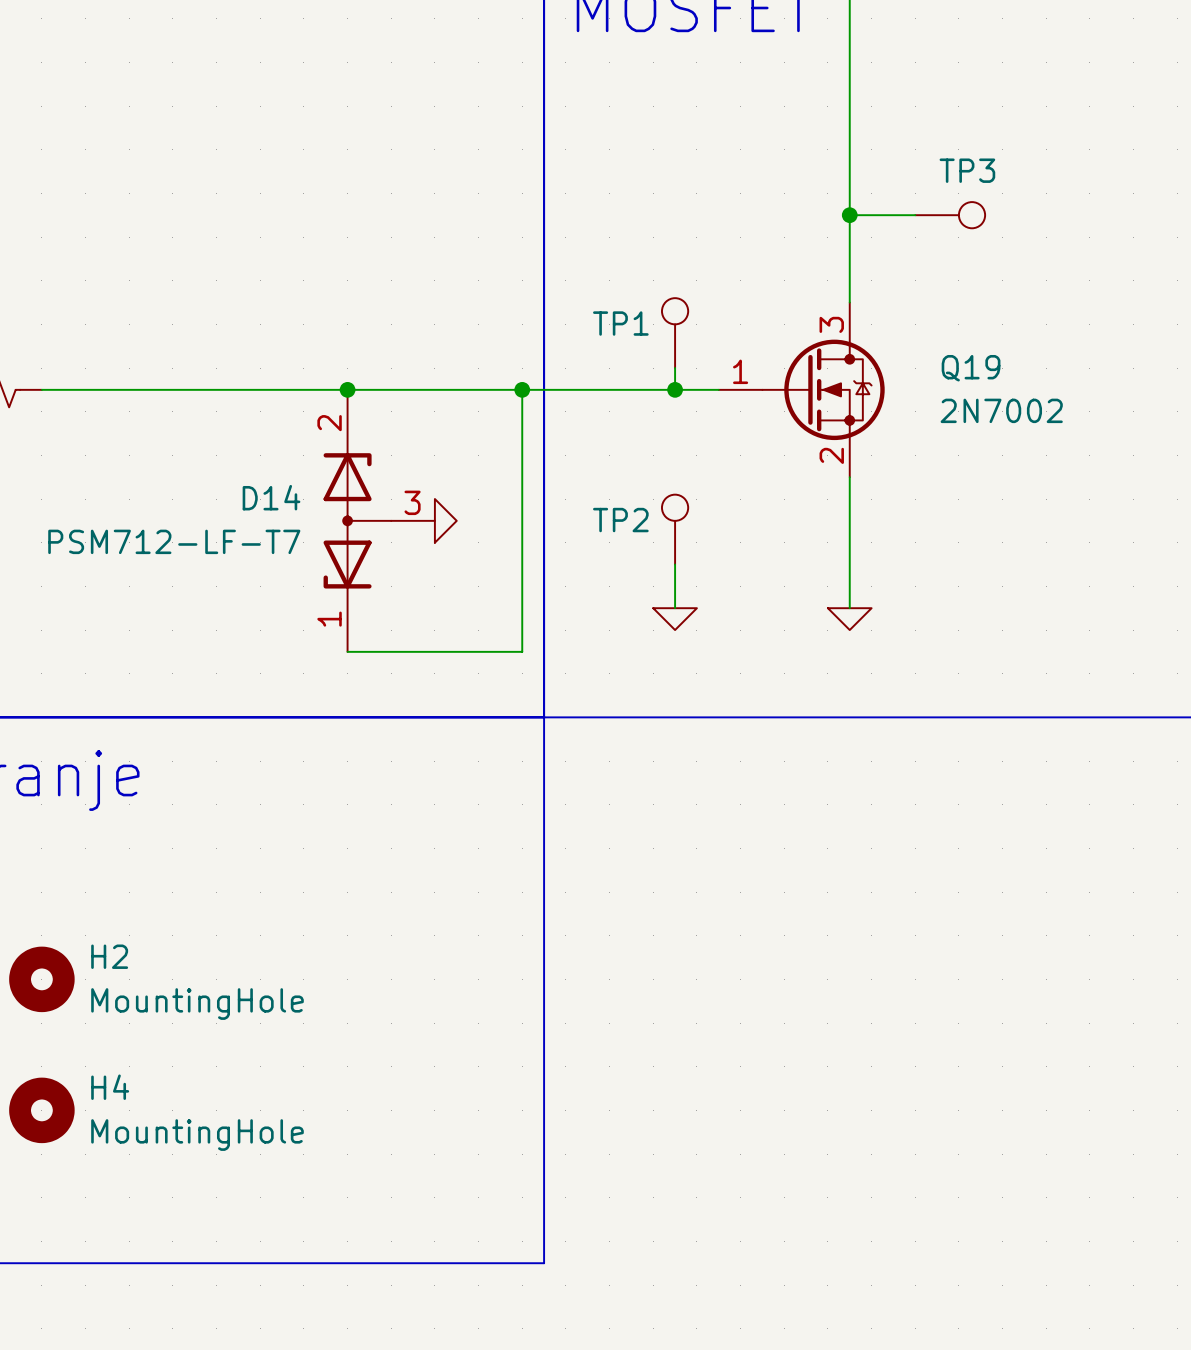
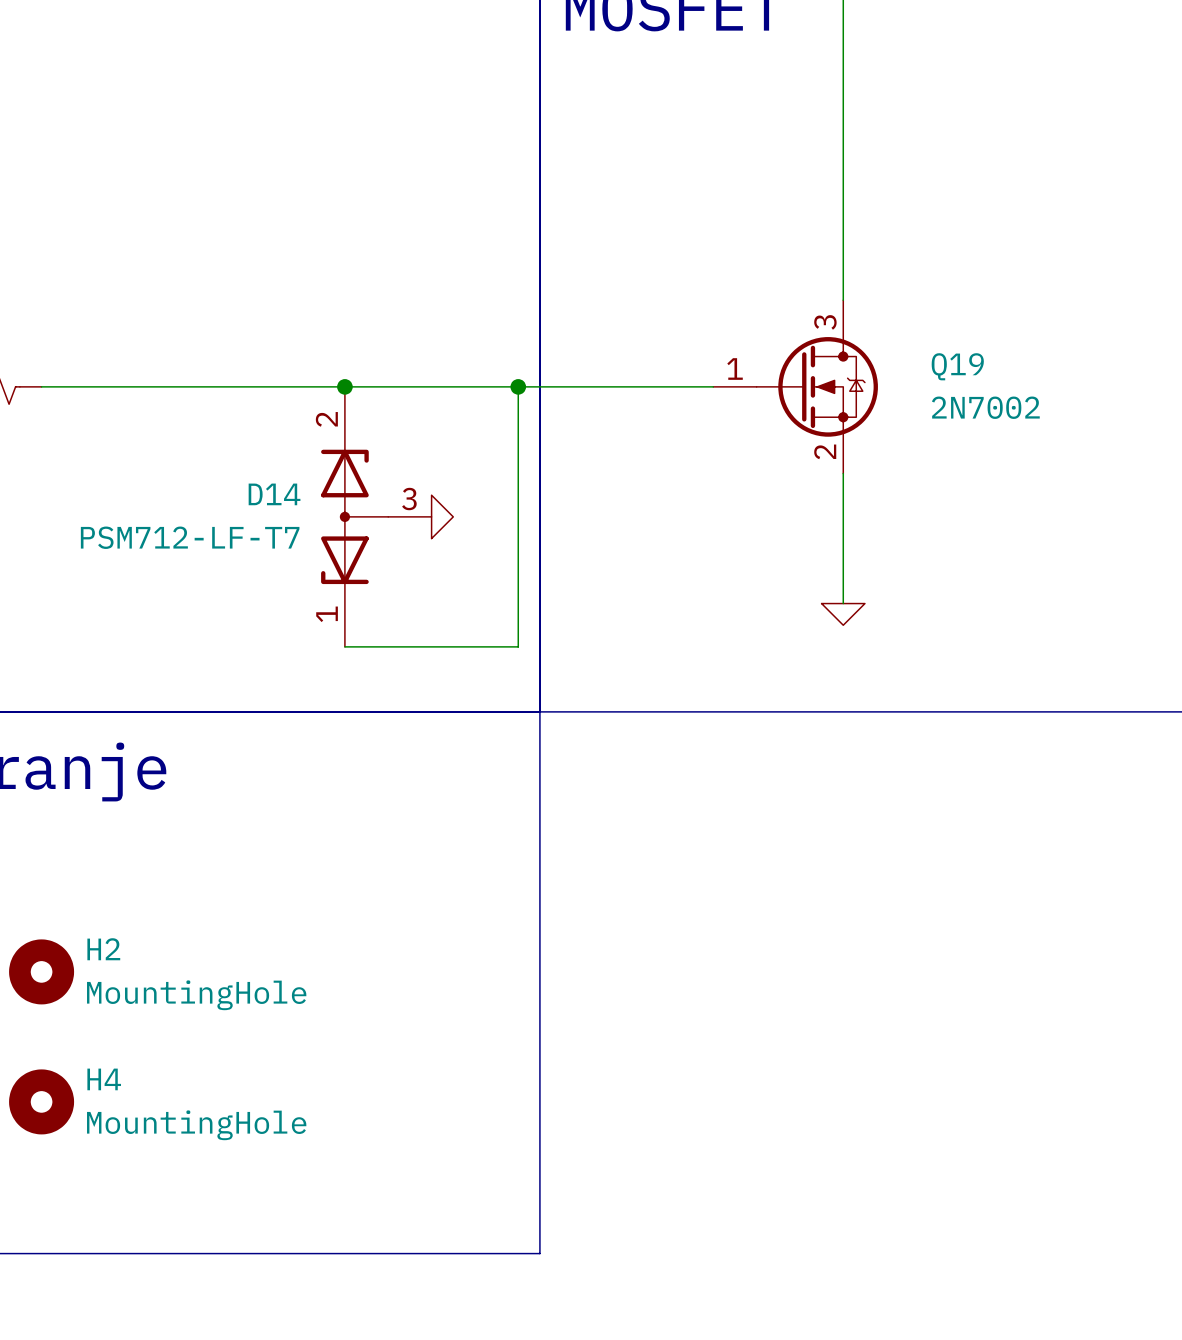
wire: (849, 215) (915, 215) -> none
junction: (849, 215) -> none
TP3: (950, 215) -> none
TP1: (675, 333) -> none
wire: (675, 368) (675, 389) -> none
junction: (675, 389) -> none
TP2: (675, 529) -> none
wire: (675, 564) (675, 608) -> none
power symbol: (675, 619) -> none

